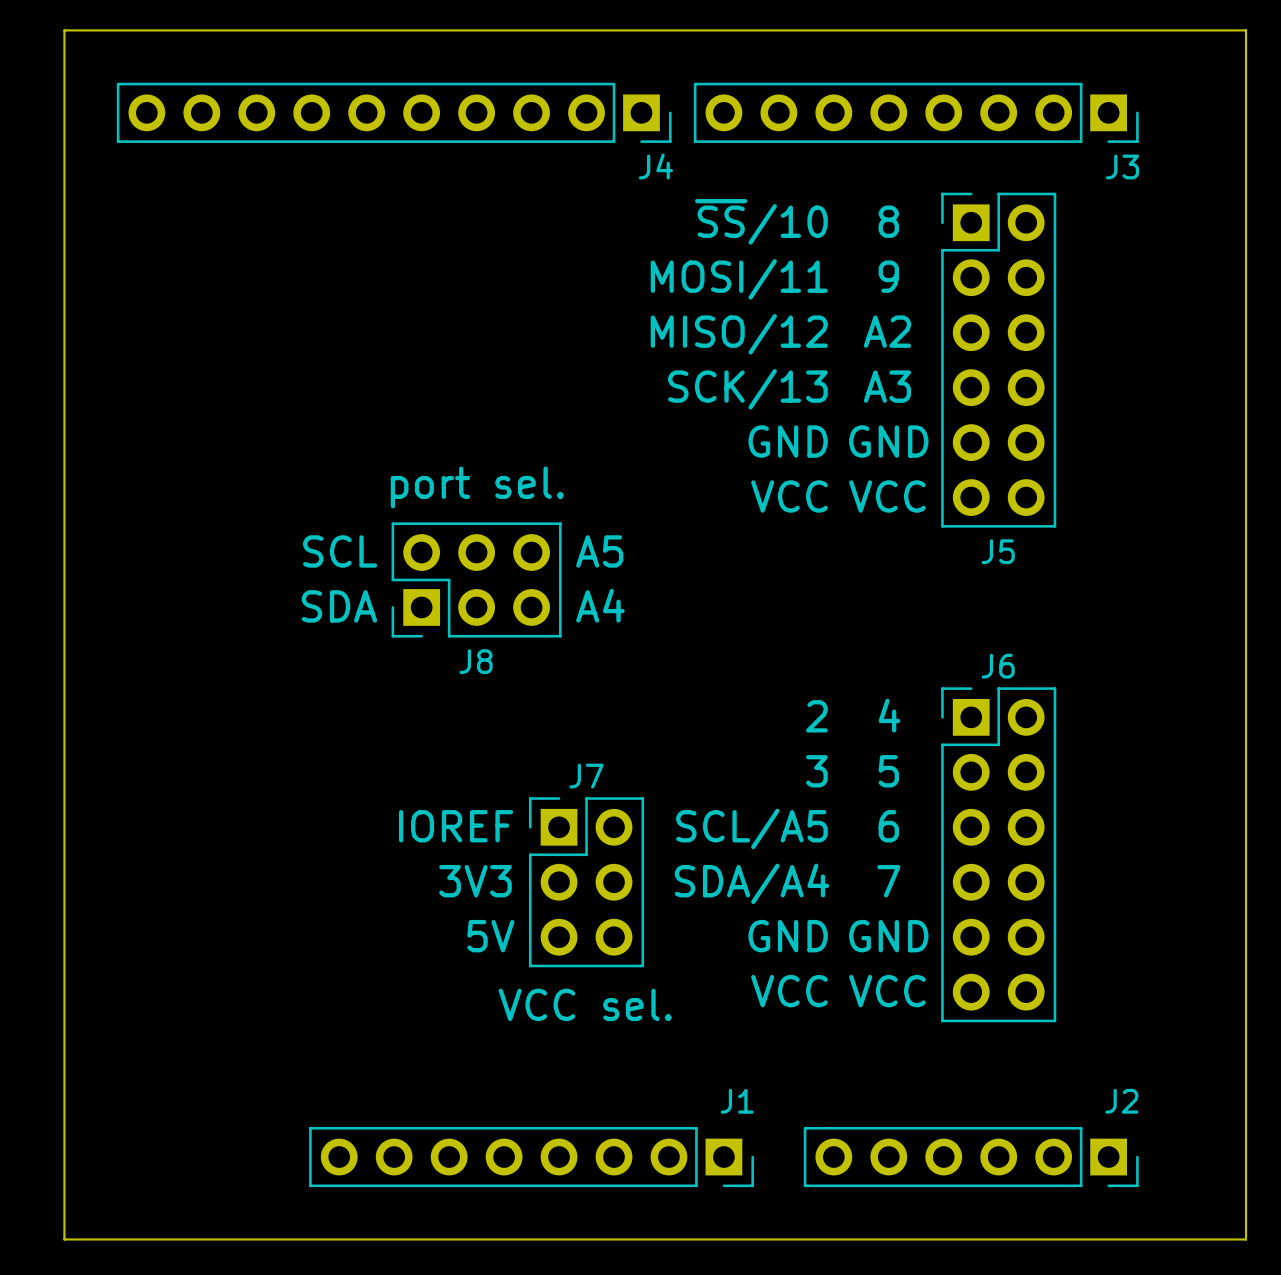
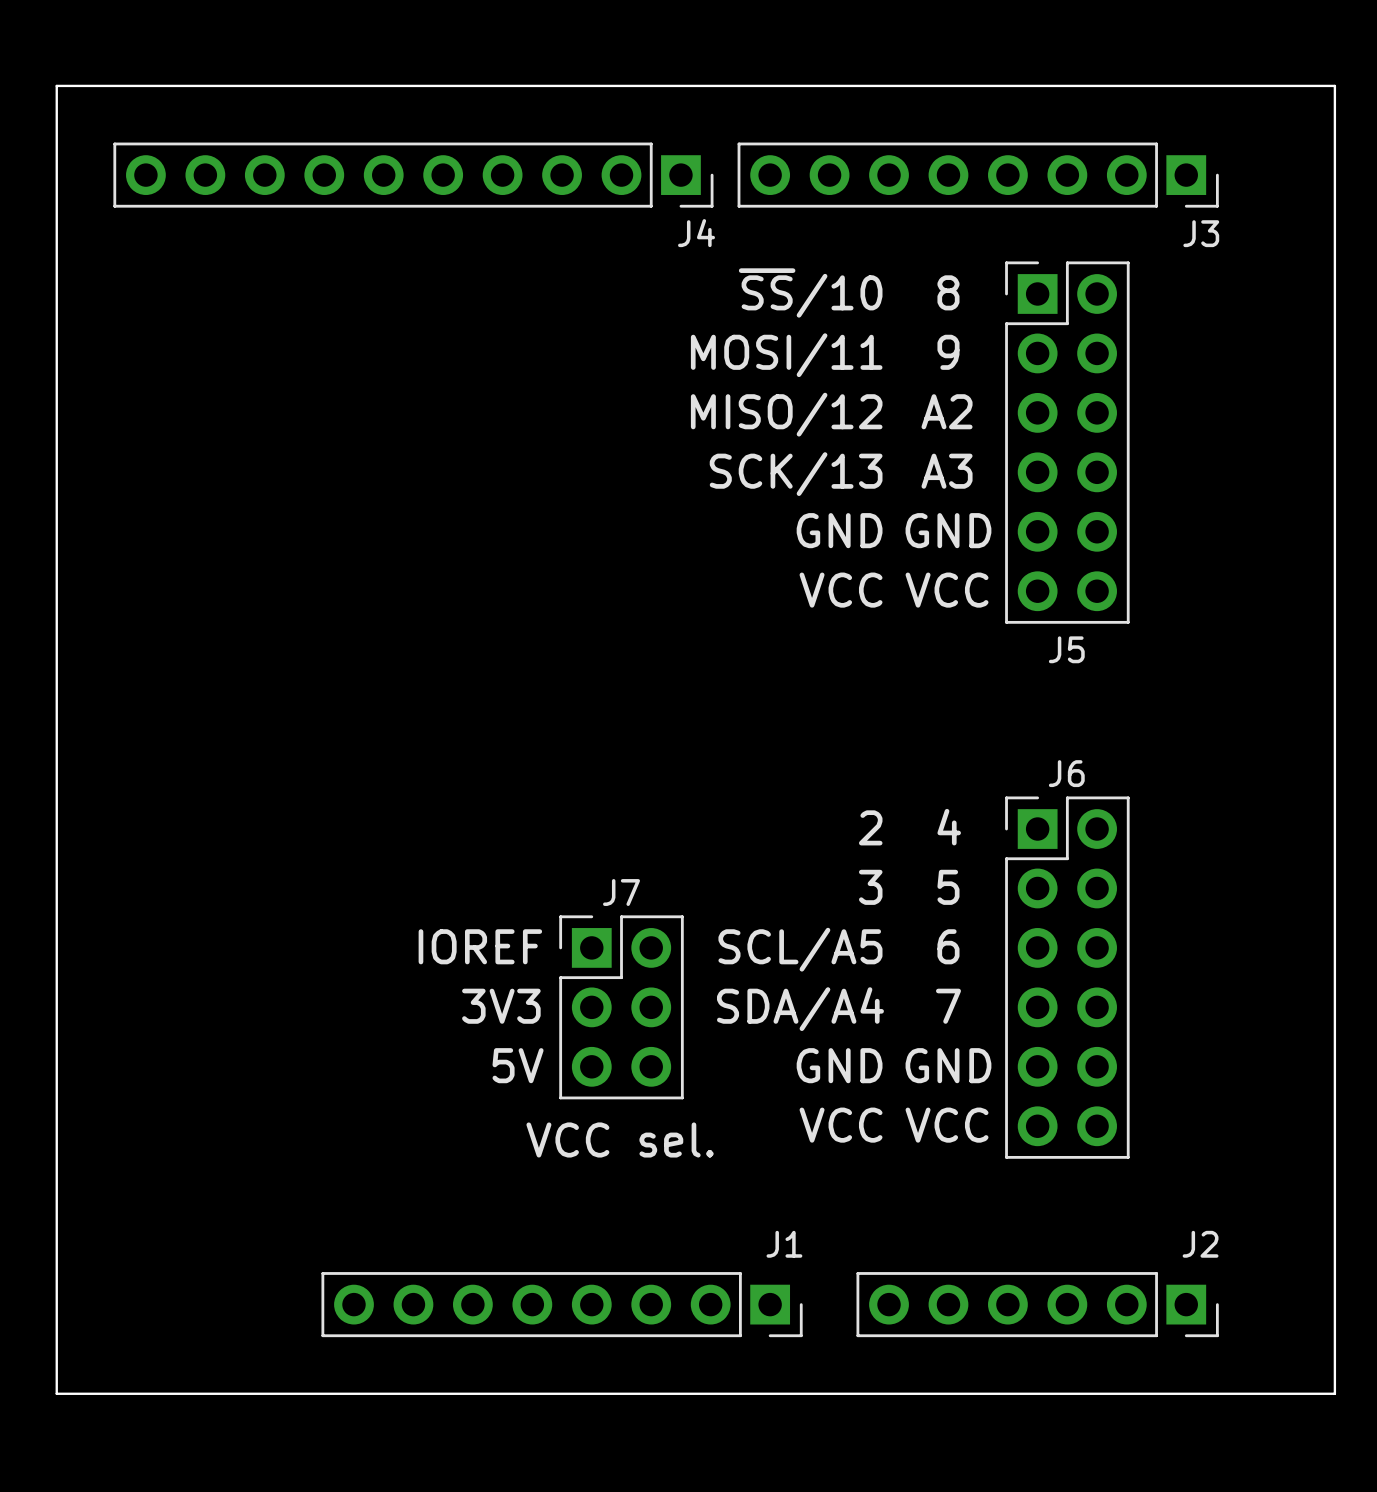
text: port sel. (477, 487) -> none
text: SCL (340, 551) -> none
text: A5 (599, 551) -> none
J8: (476, 579) -> none
text: A4 (600, 605) -> none
text: SDA (339, 606) -> none

